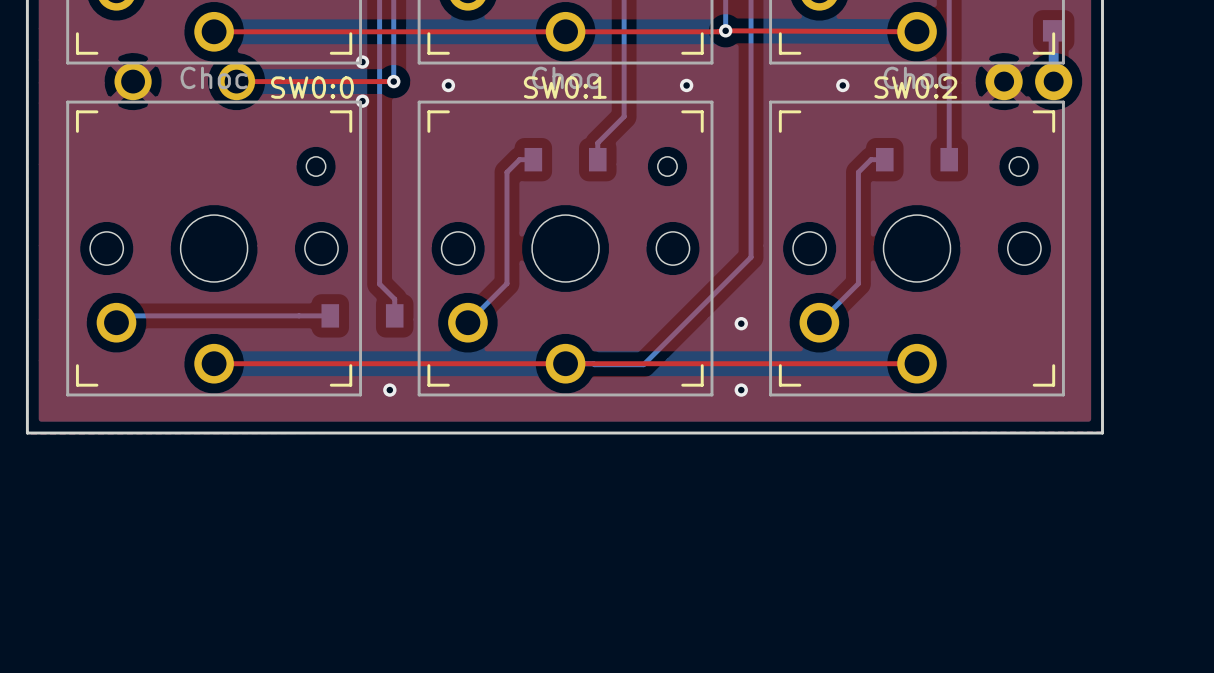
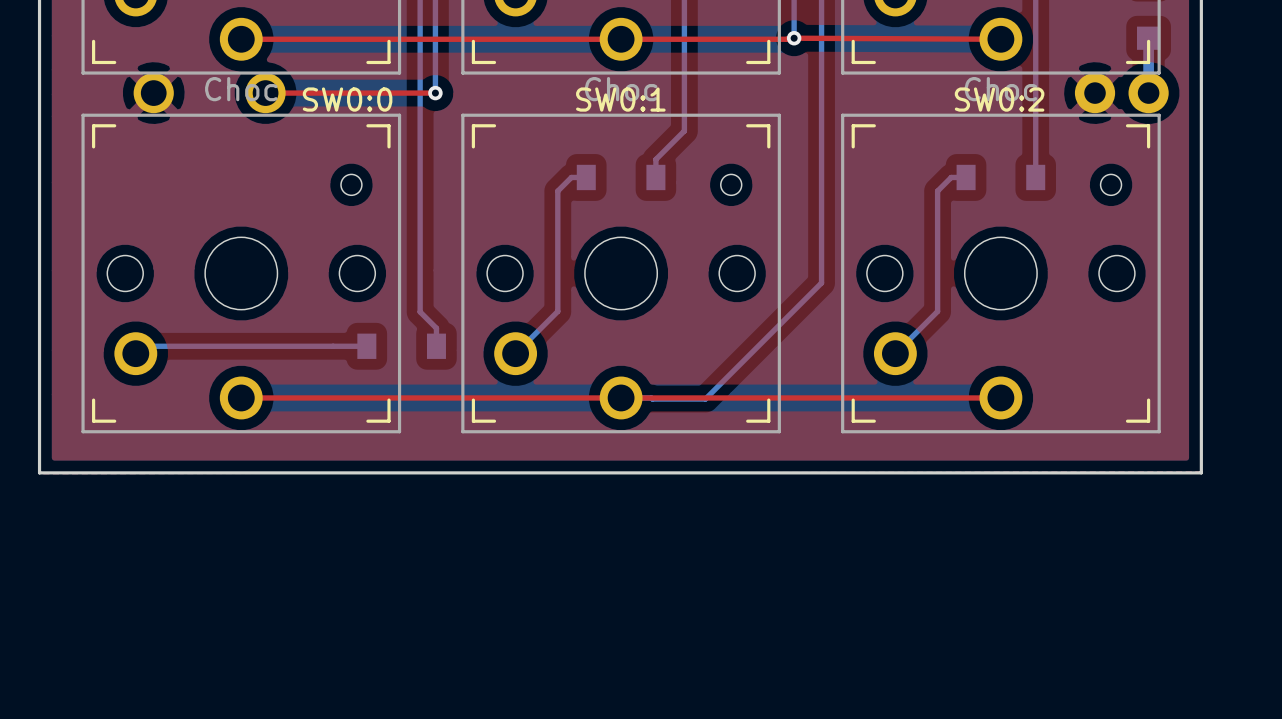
via: (362, 62) -> none
via: (448, 85) -> none
via: (686, 85) -> none
via: (842, 85) -> none
via: (362, 101) -> none
via: (741, 323) -> none
via: (389, 390) -> none
via: (741, 390) -> none

